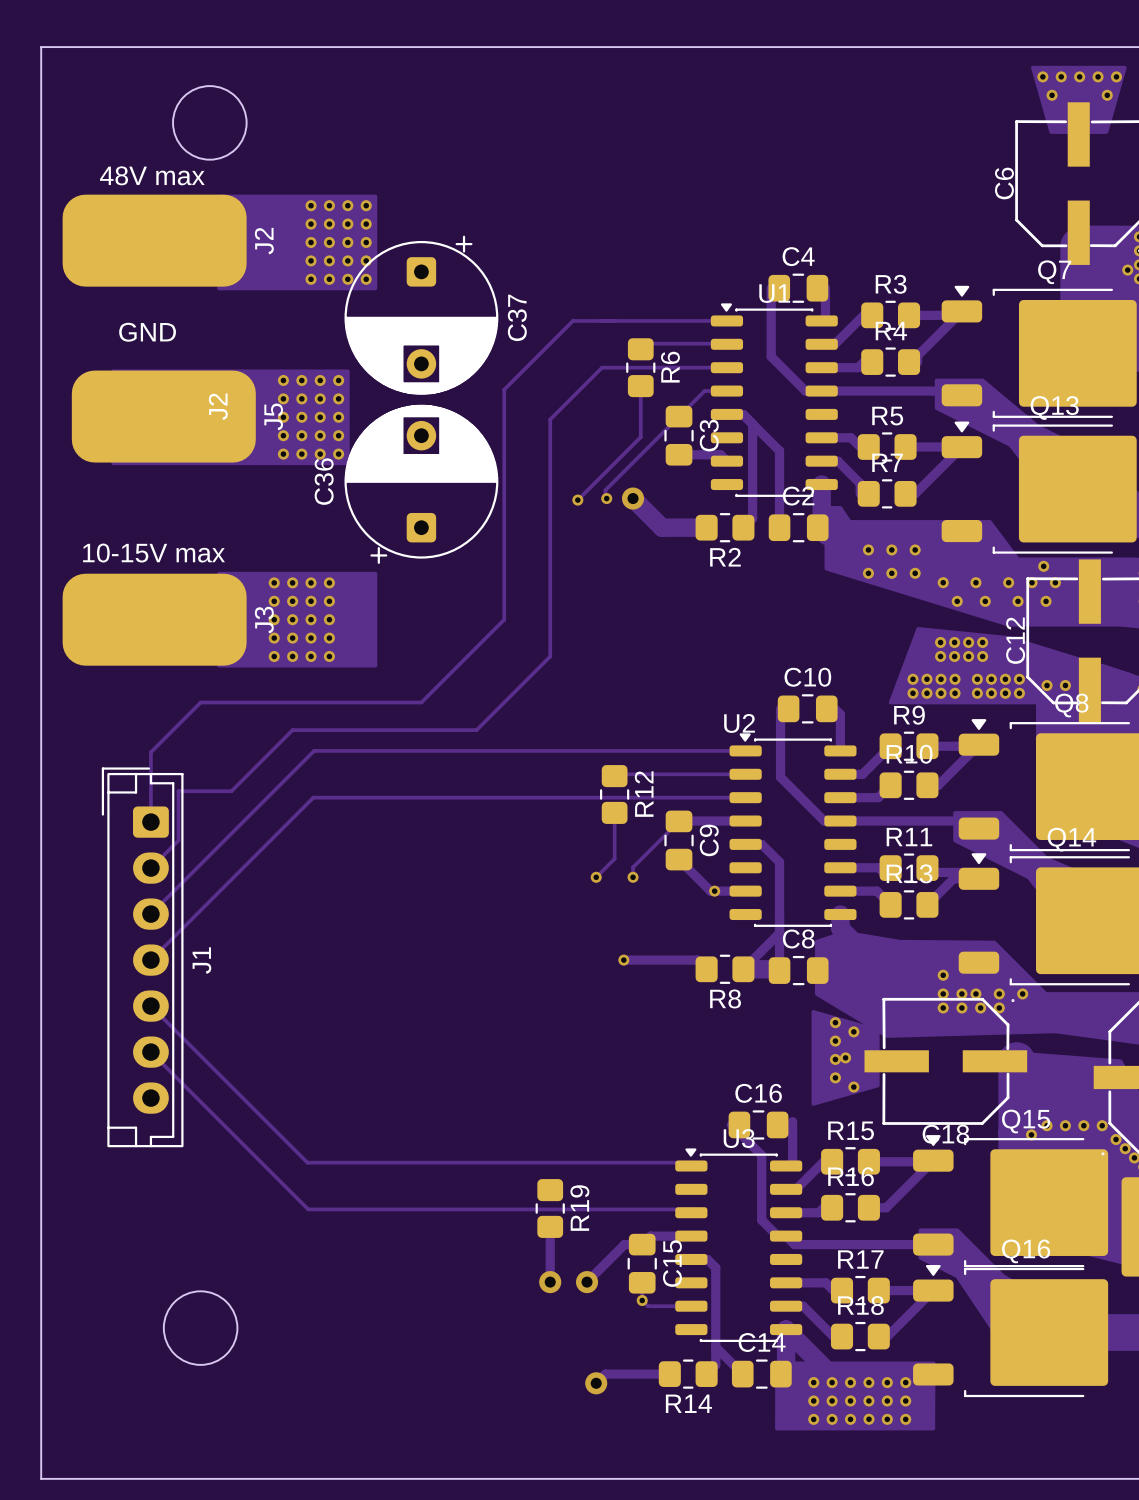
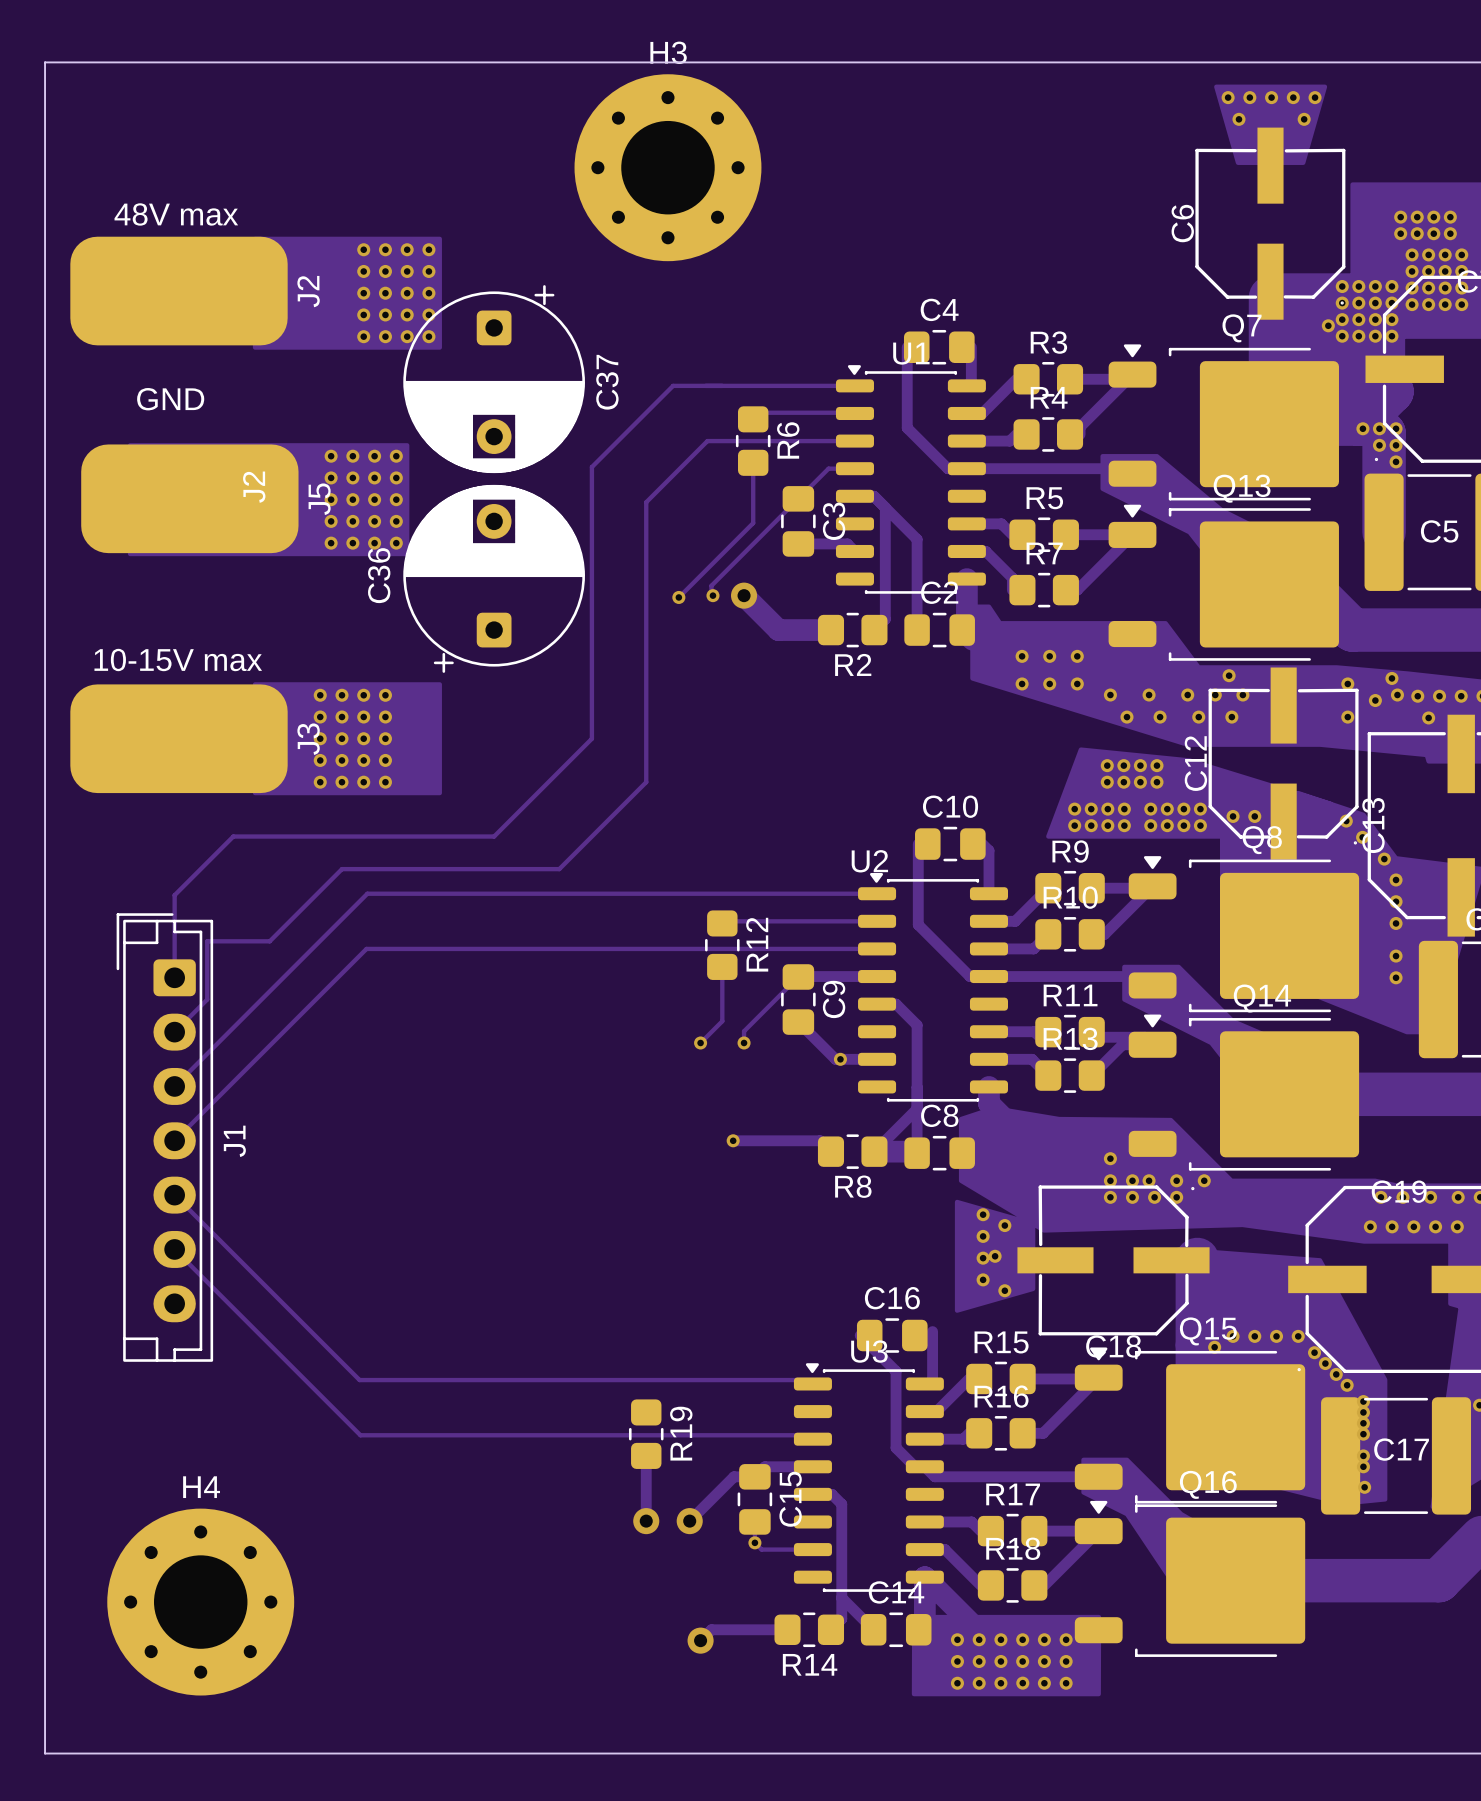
round board edge: [172, 85, 248, 161] -> none
H3: none -> (667, 167)
round board edge: [163, 1290, 238, 1366] -> none
H4: none -> (200, 1602)

